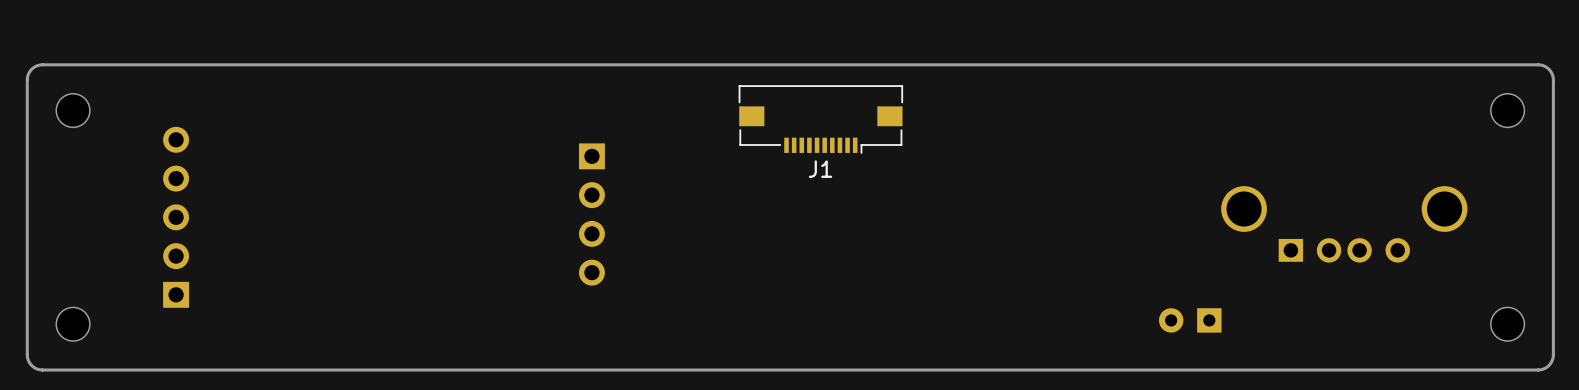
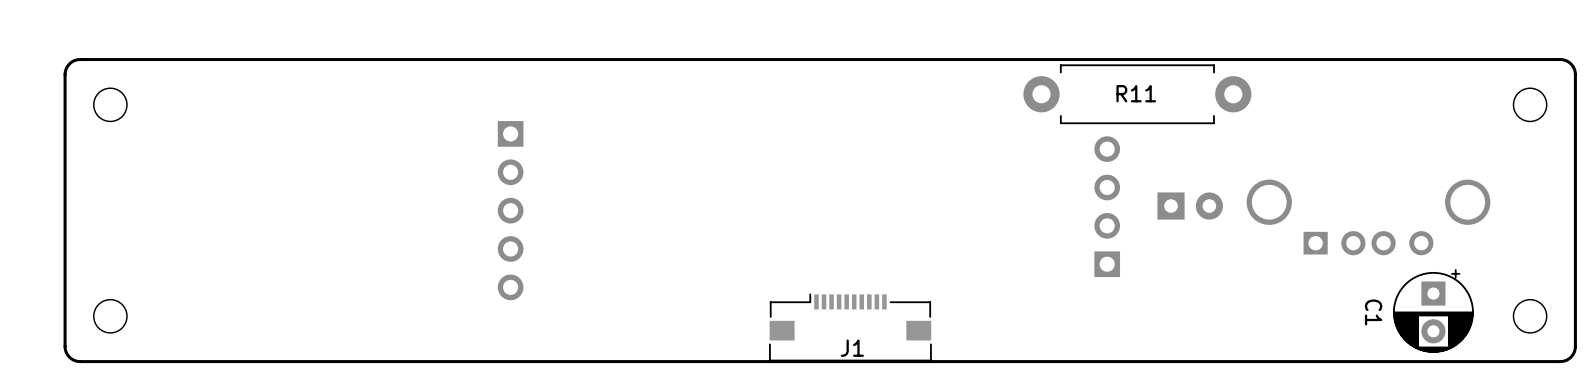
R11: none -> (1137, 94)
J1 rotation: 0° (820, 119) -> 180° (850, 327)
J1 position: (820, 119) -> (850, 327)
part: none -> (1190, 206)
part: none -> (1107, 206)
part: (591, 214) -> none
part rotation: 0° (176, 217) -> 180° (510, 210)
part position: (176, 217) -> (510, 210)
C1 side: top (1190, 320) -> bottom (1433, 311)

